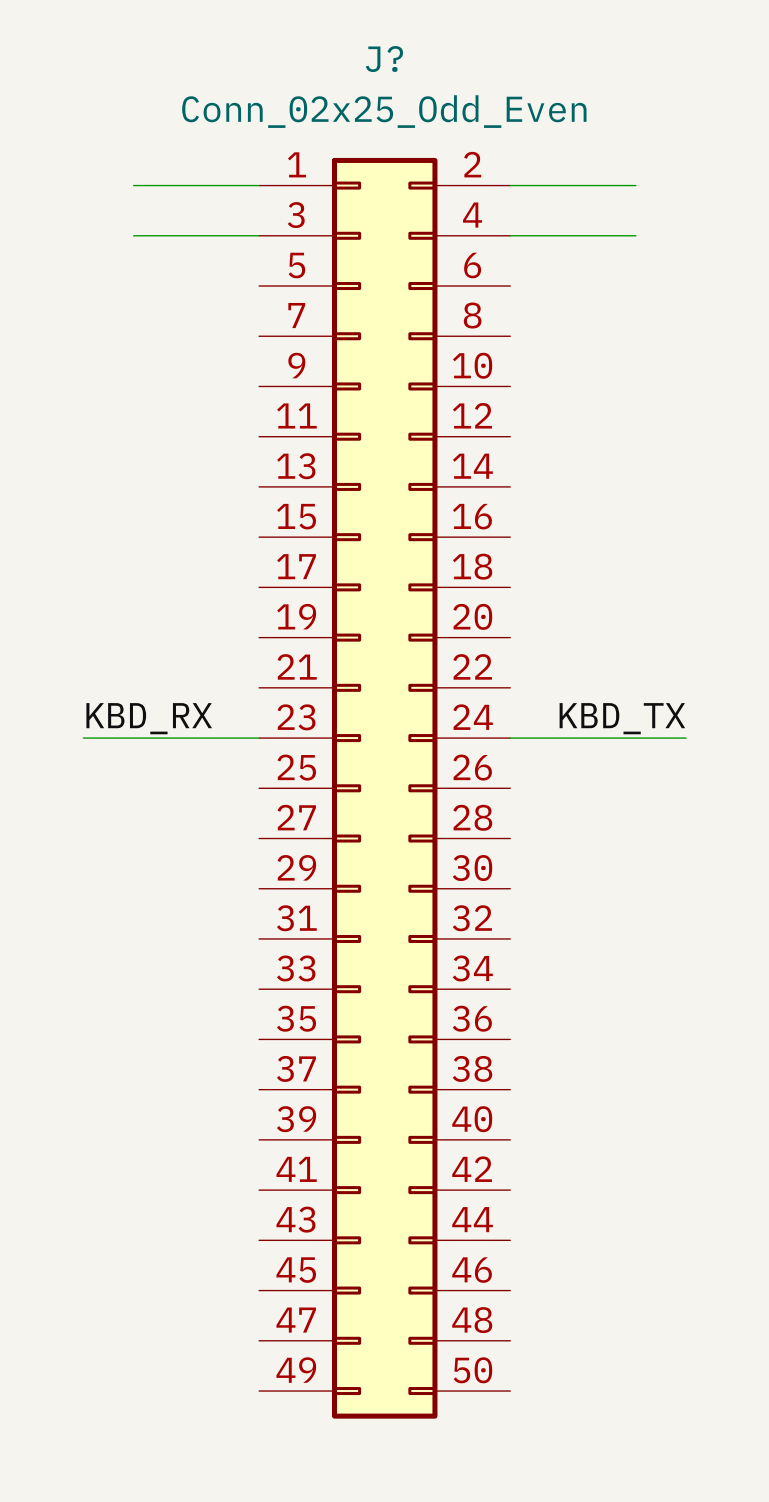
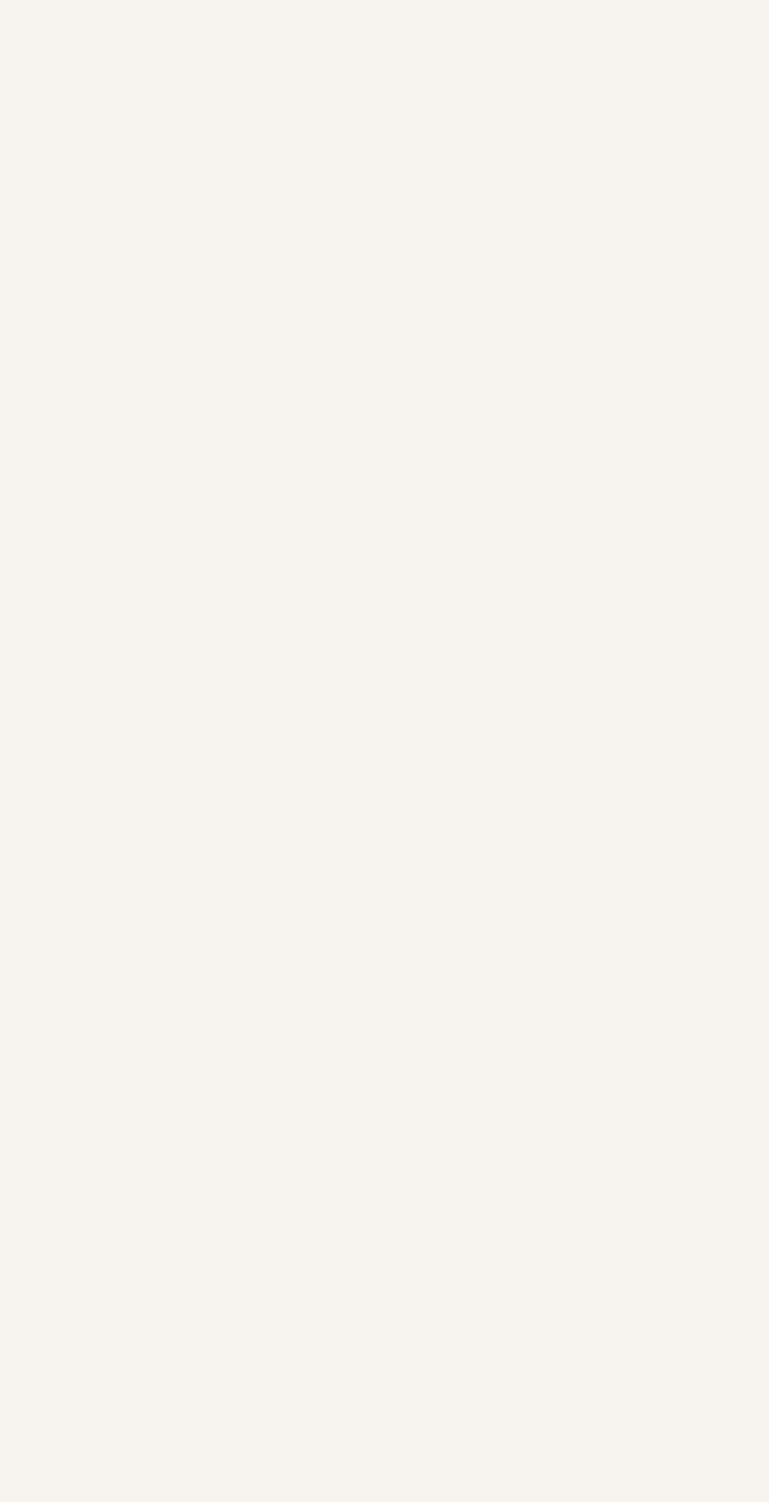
wire: (133, 185) (259, 185) -> none
wire: (510, 185) (635, 185) -> none
wire: (133, 235) (259, 235) -> none
wire: (510, 235) (635, 235) -> none
label: KBD_RX (149, 718) -> none
label: KBD_TX (622, 718) -> none
wire: (83, 738) (259, 738) -> none
wire: (510, 738) (686, 738) -> none
J?: Conn_02x25_Odd_Even (384, 788) -> none

